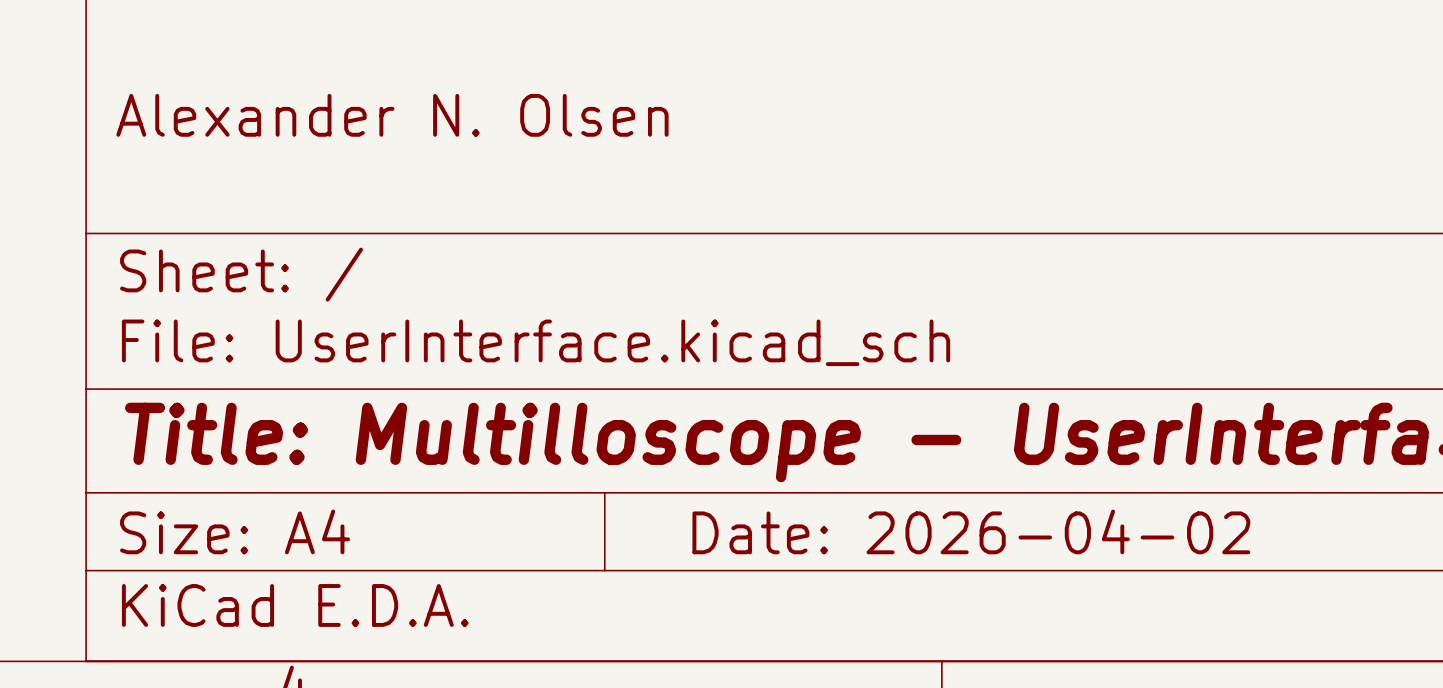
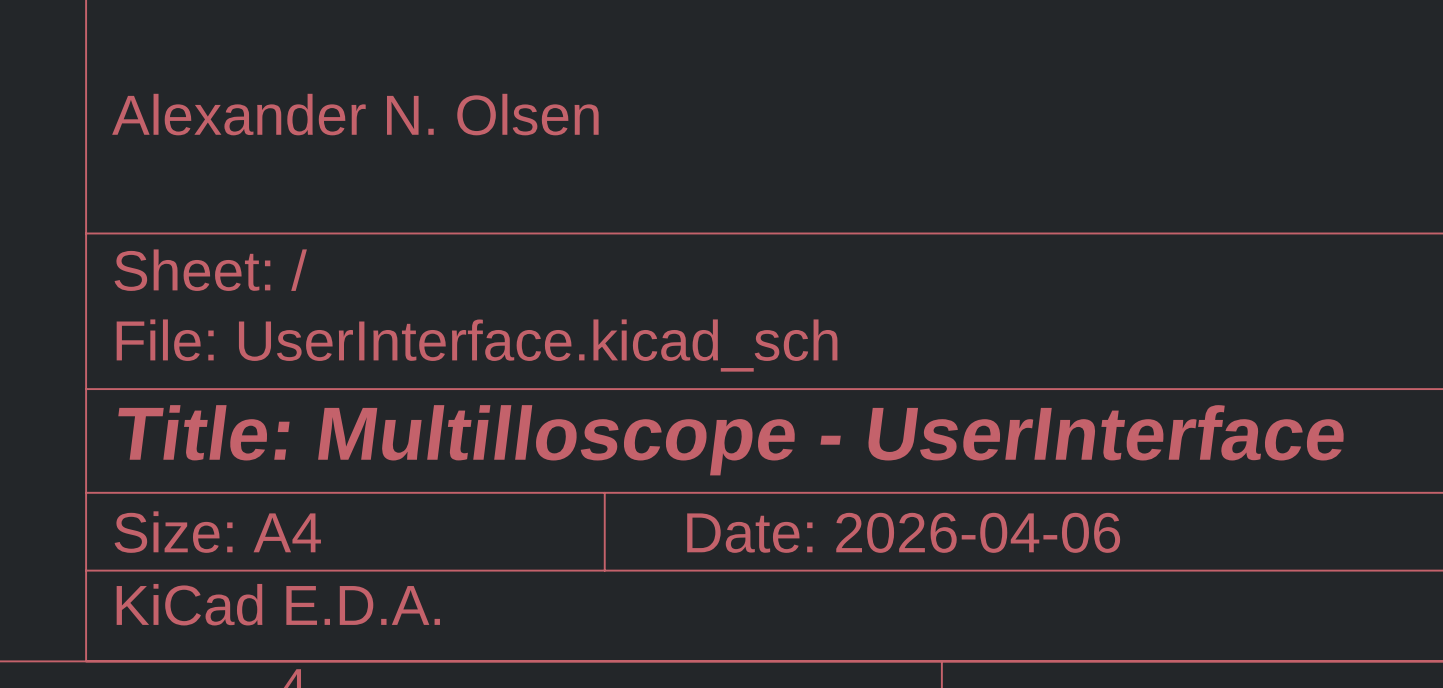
title block: Date: 2026-04-02 (971, 531) -> Date: 2026-04-06 (903, 532)

